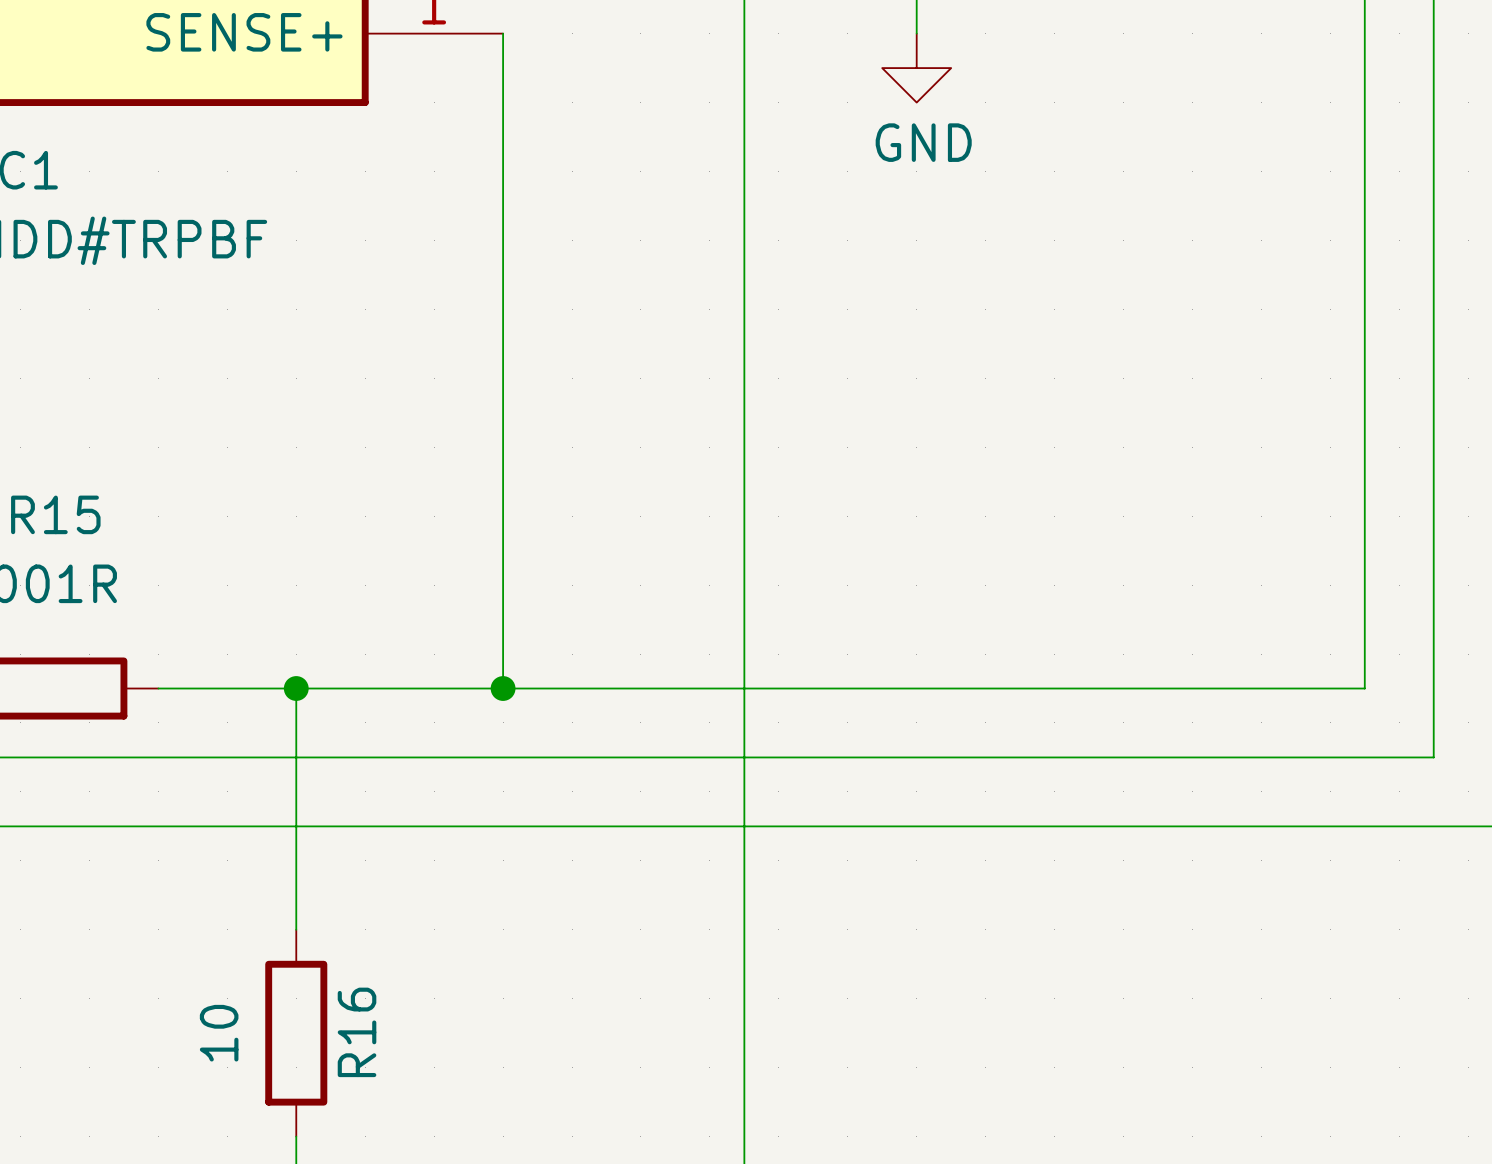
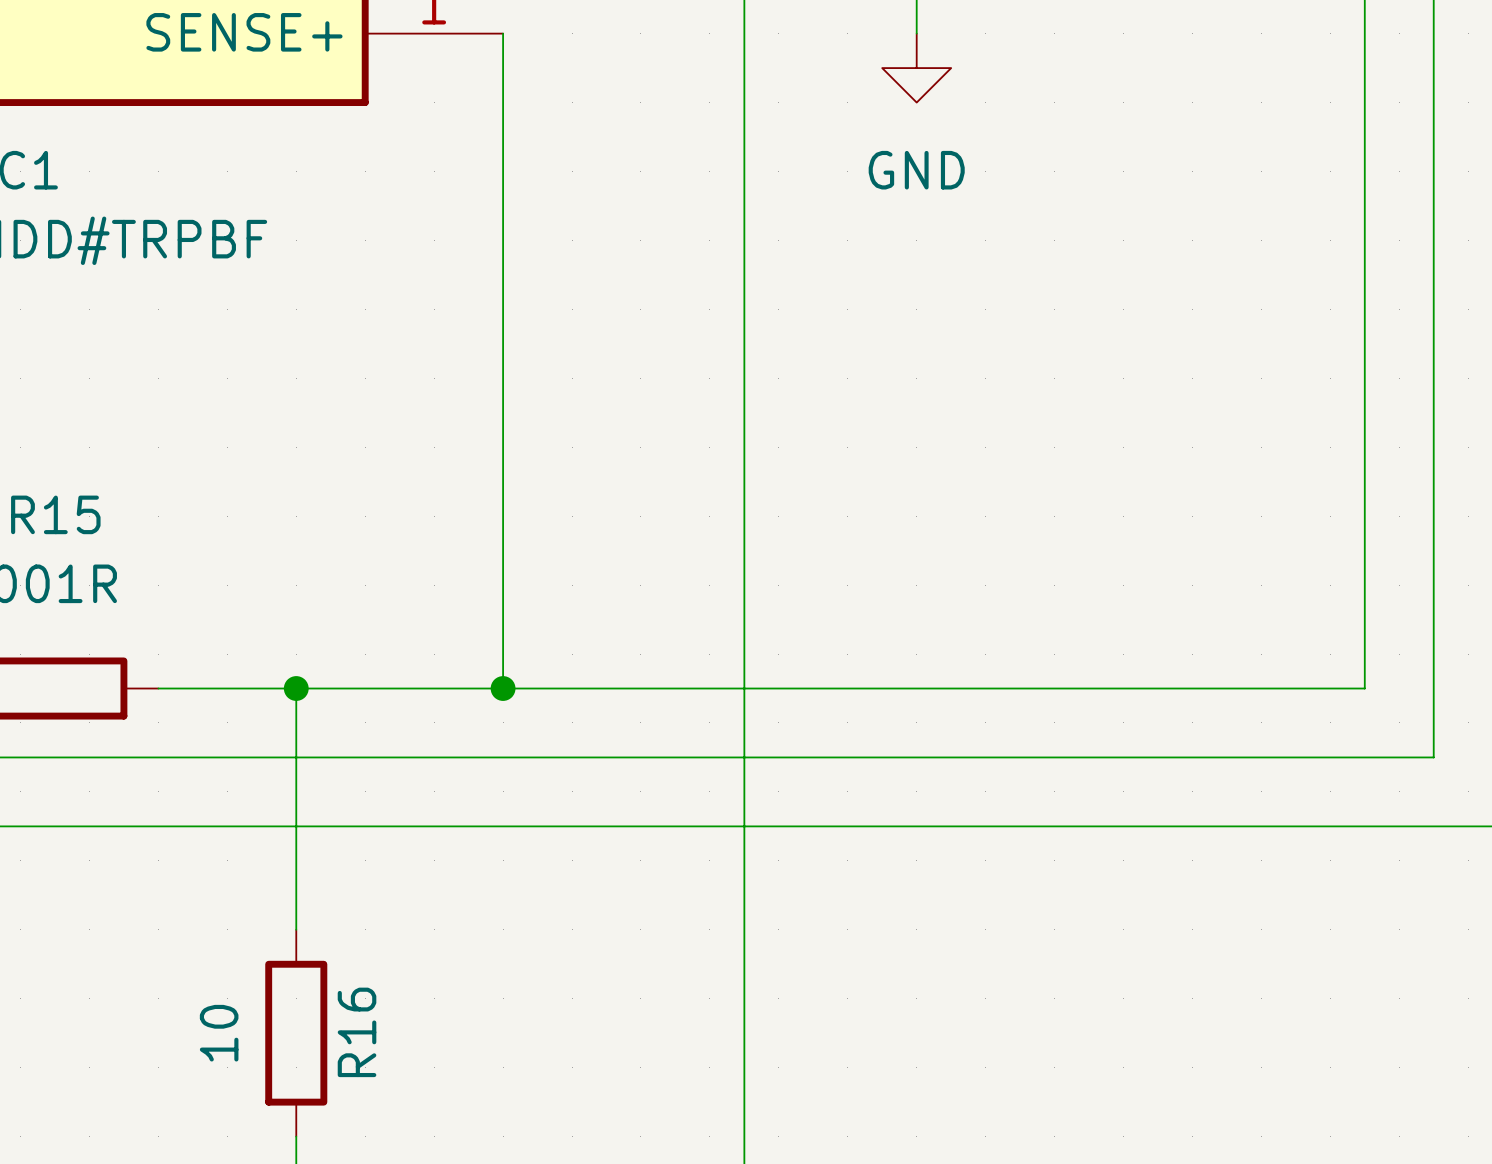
power symbol text position: GND (923, 142) -> GND (916, 170)

